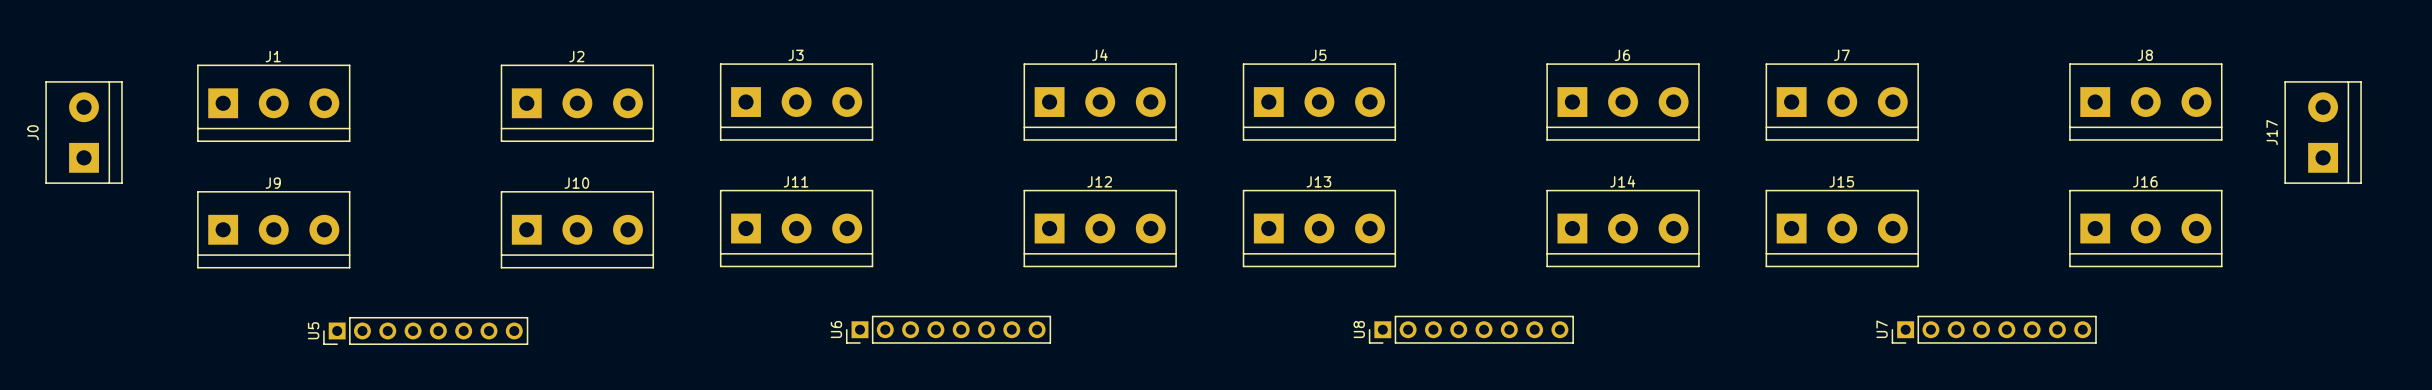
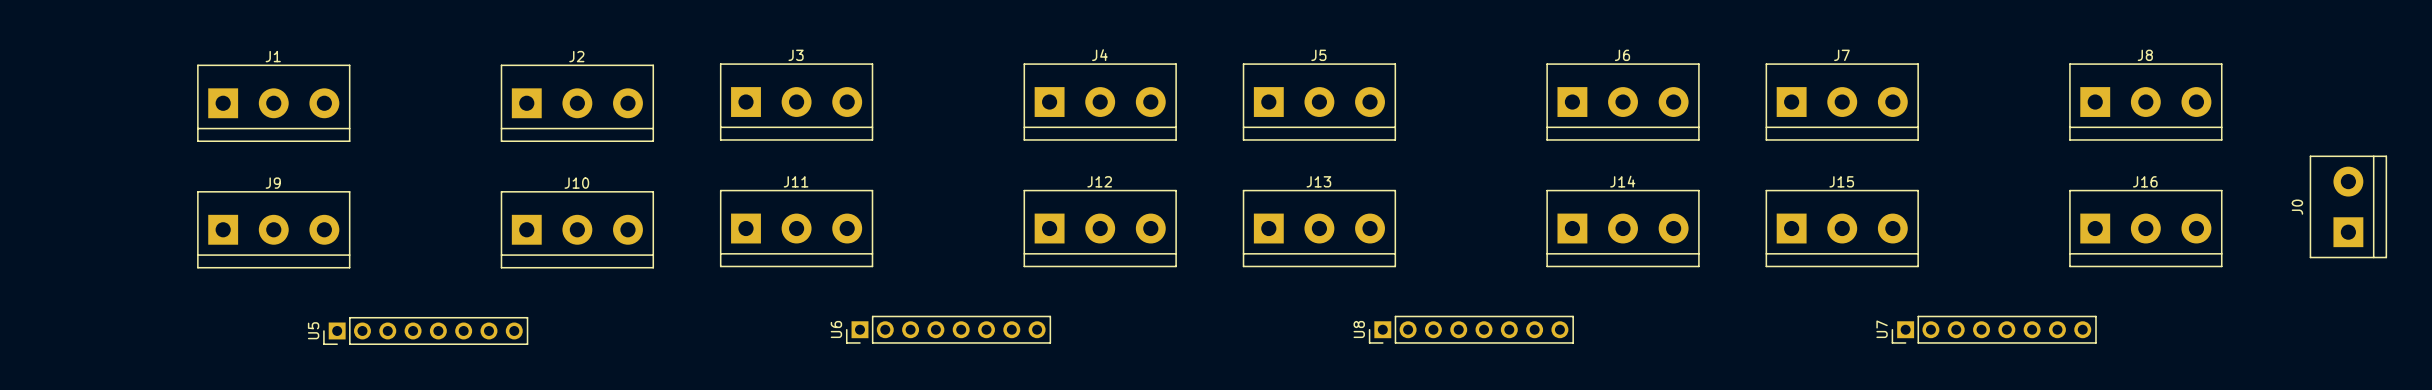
J0 position: (84, 132) -> (2348, 206)
J17: (2323, 132) -> none

